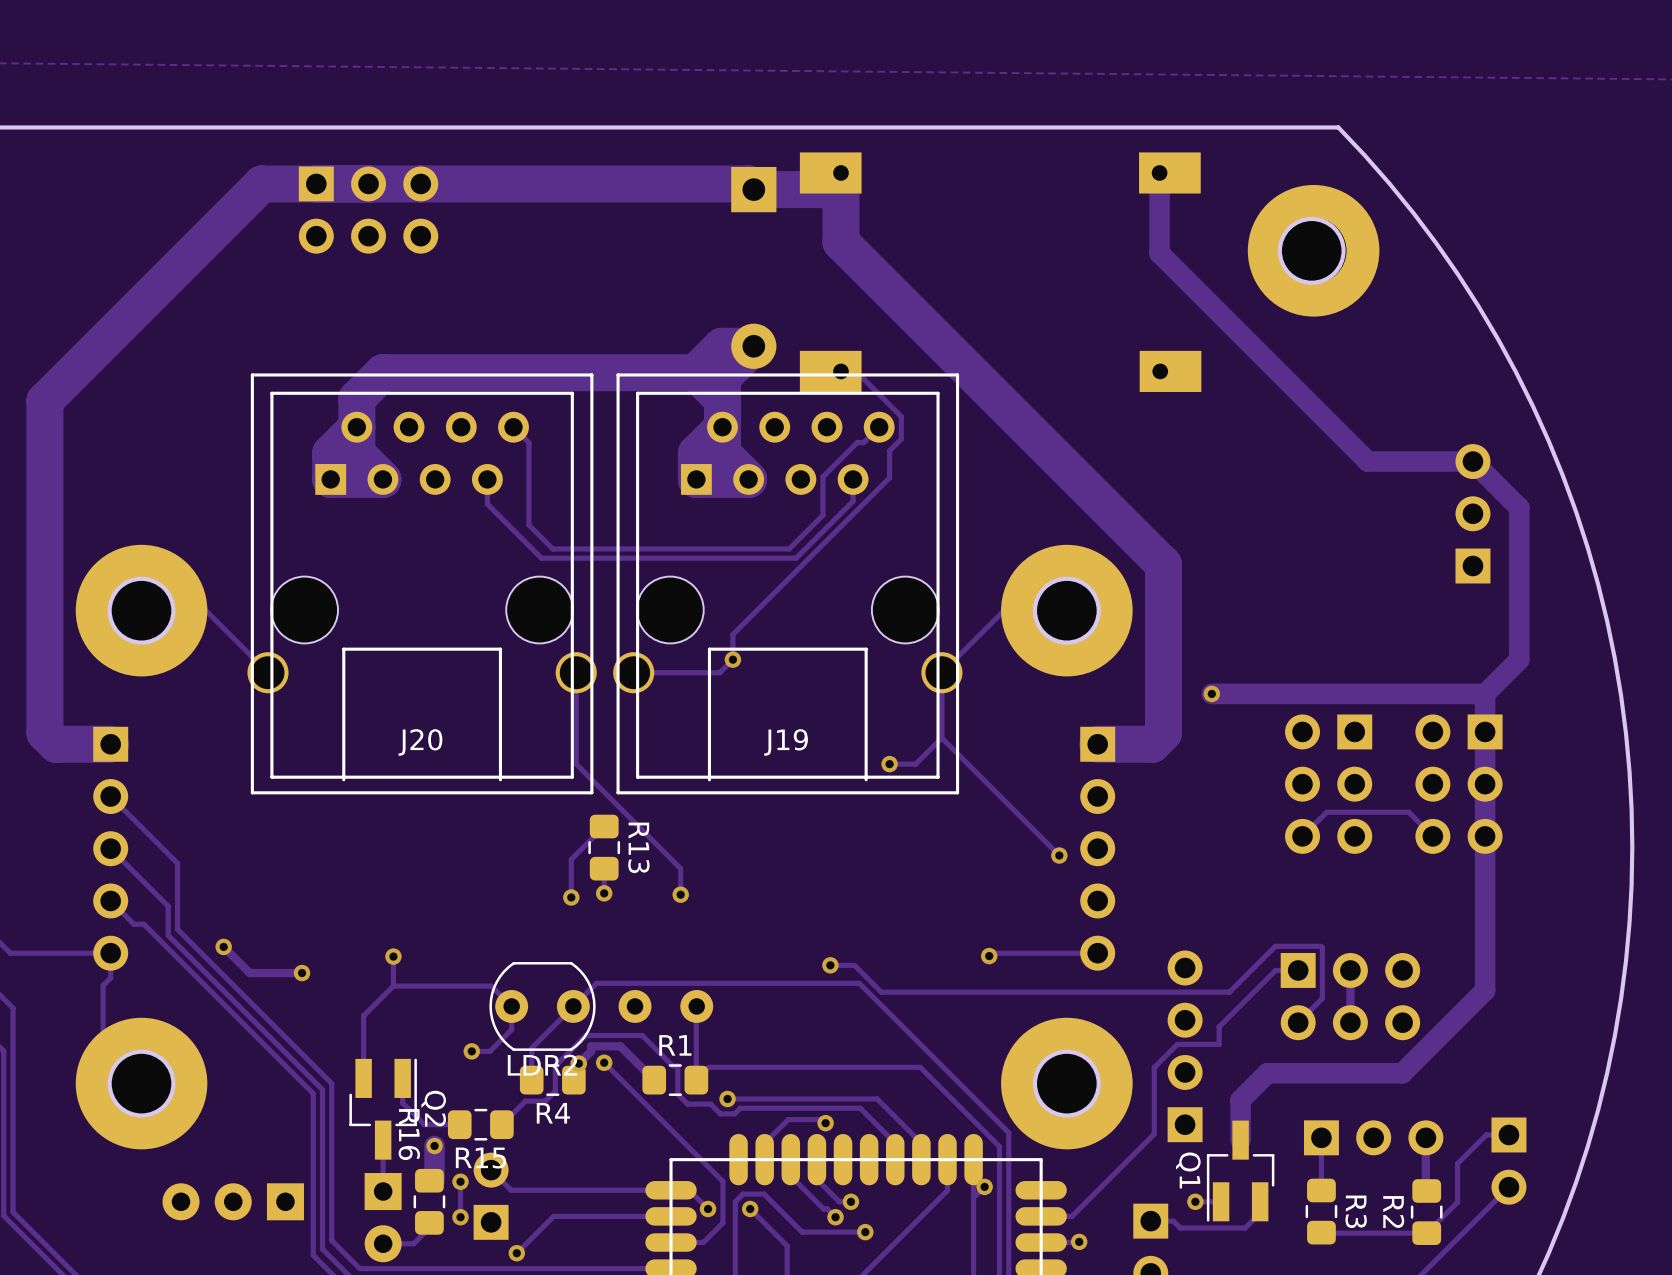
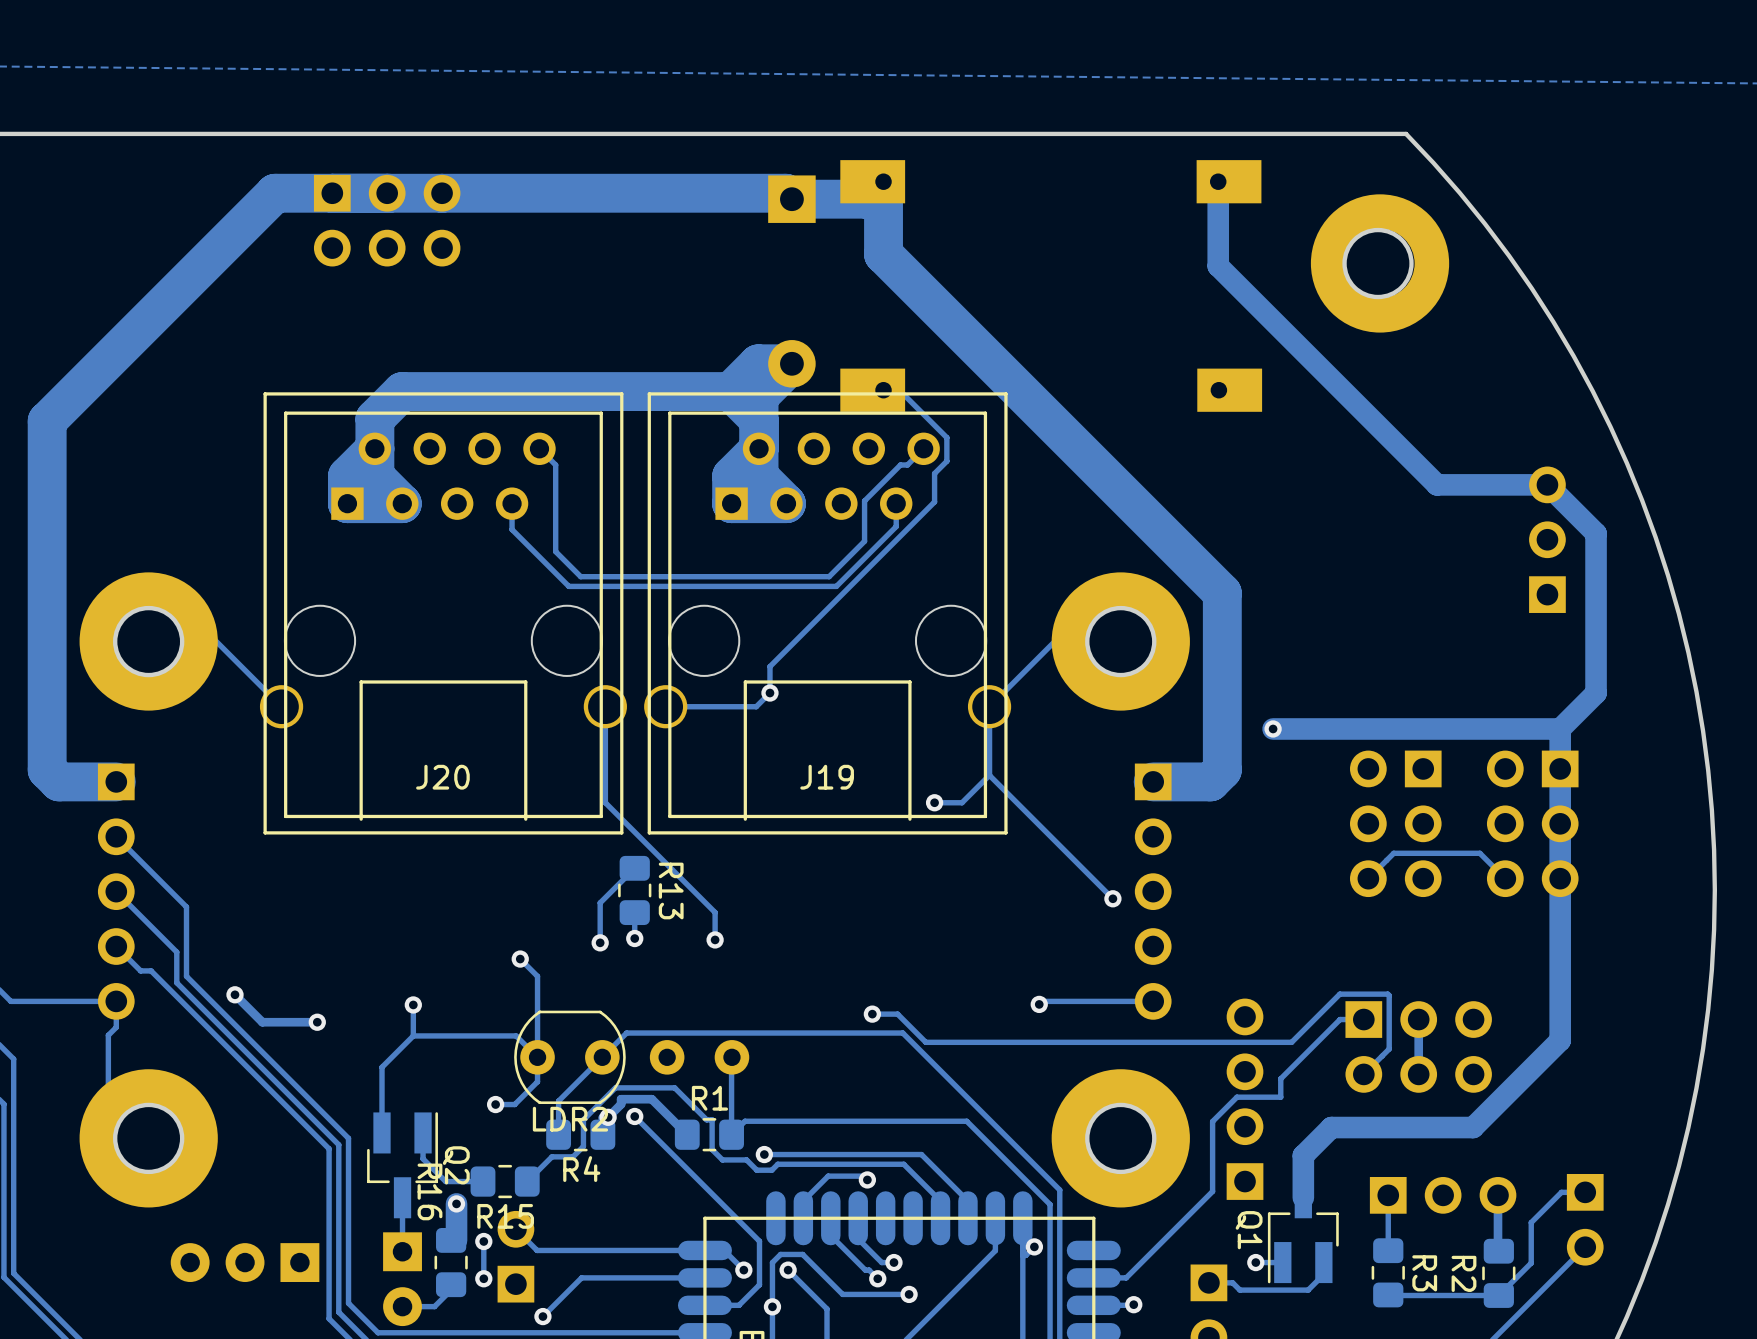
track: none -> (520, 959) (537, 976) (537, 1057)
via: none -> (520, 959)
via: none -> (772, 1306)

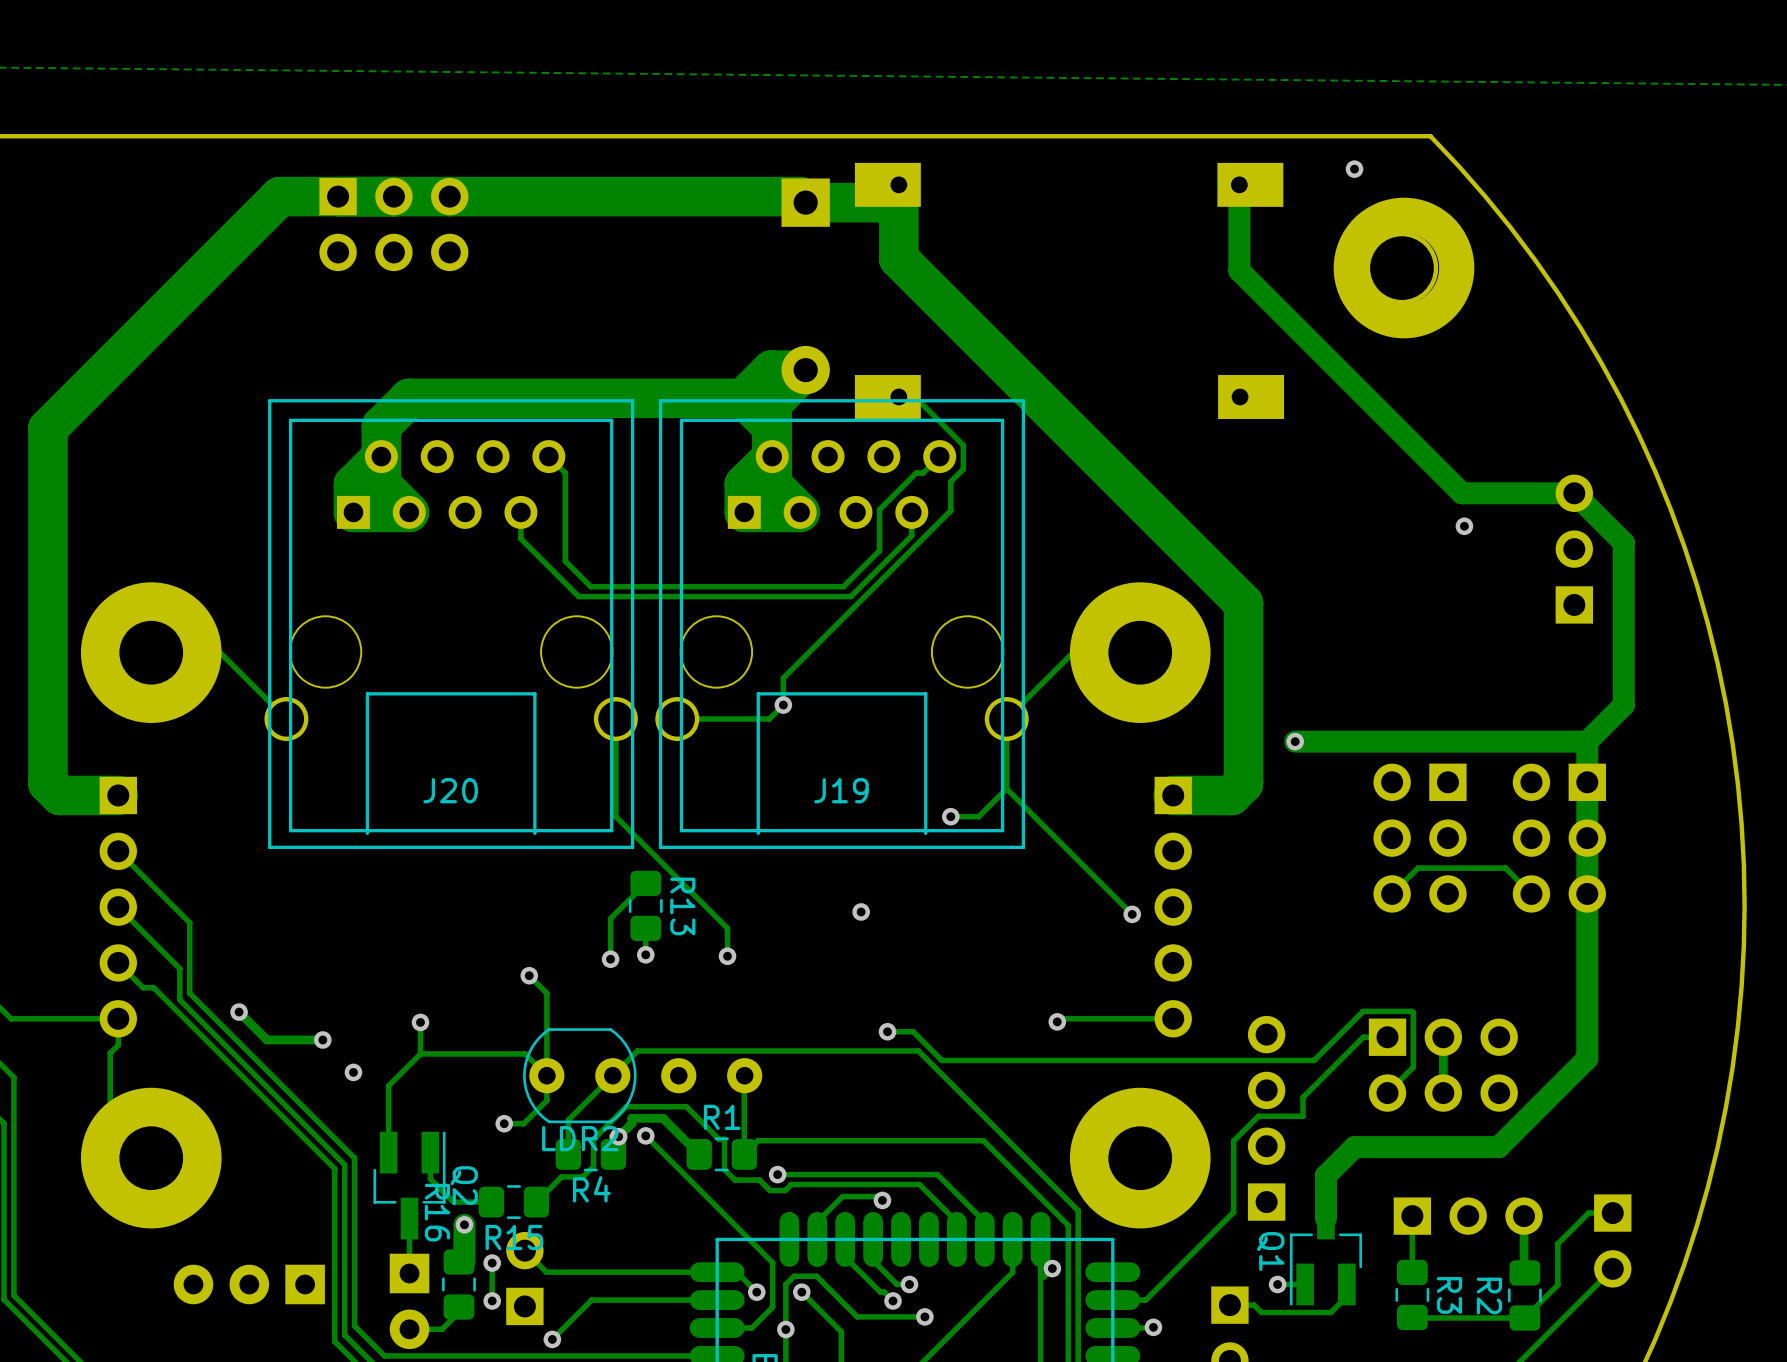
via: none -> (1354, 169)
via: none -> (1464, 526)
via: none -> (861, 911)
via: none -> (353, 1072)

